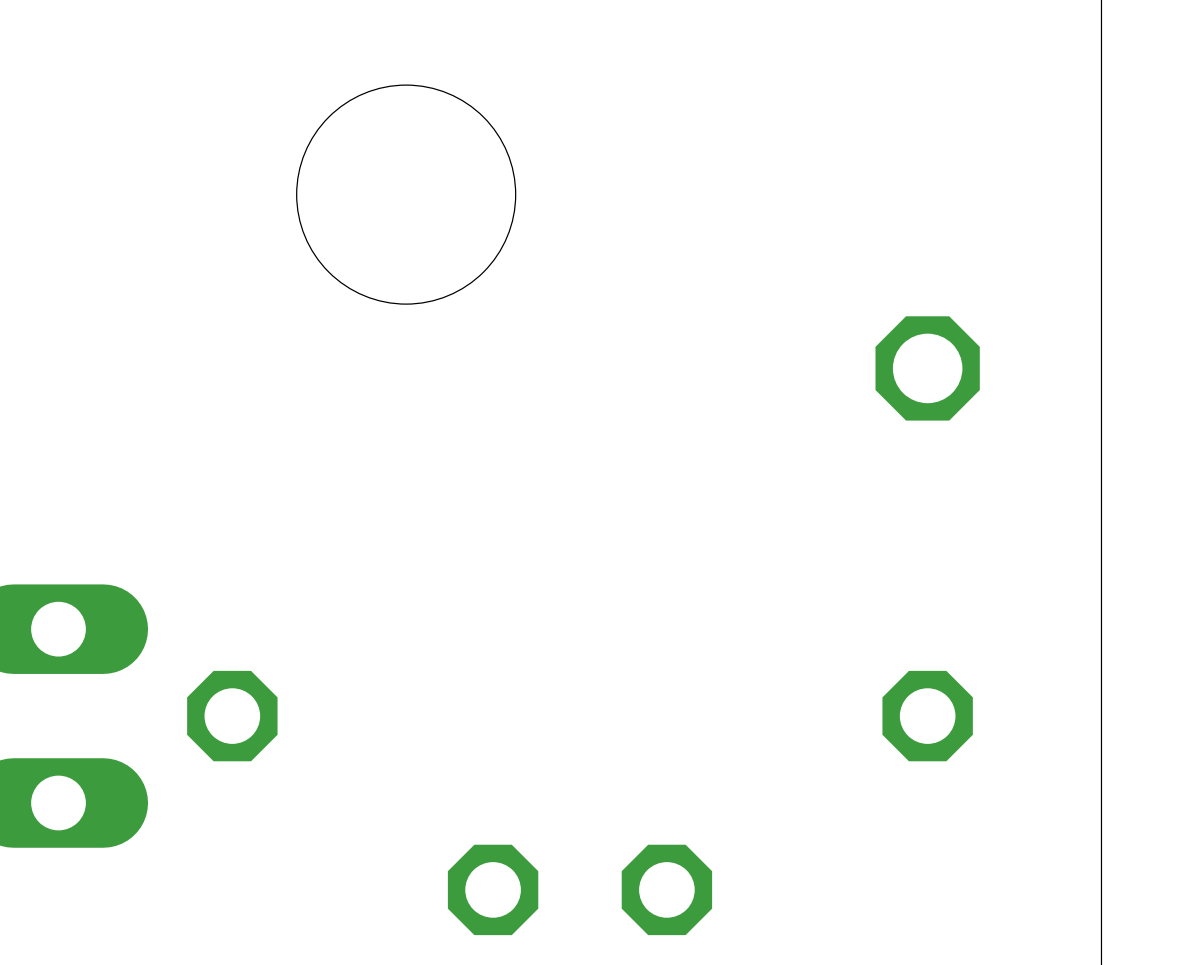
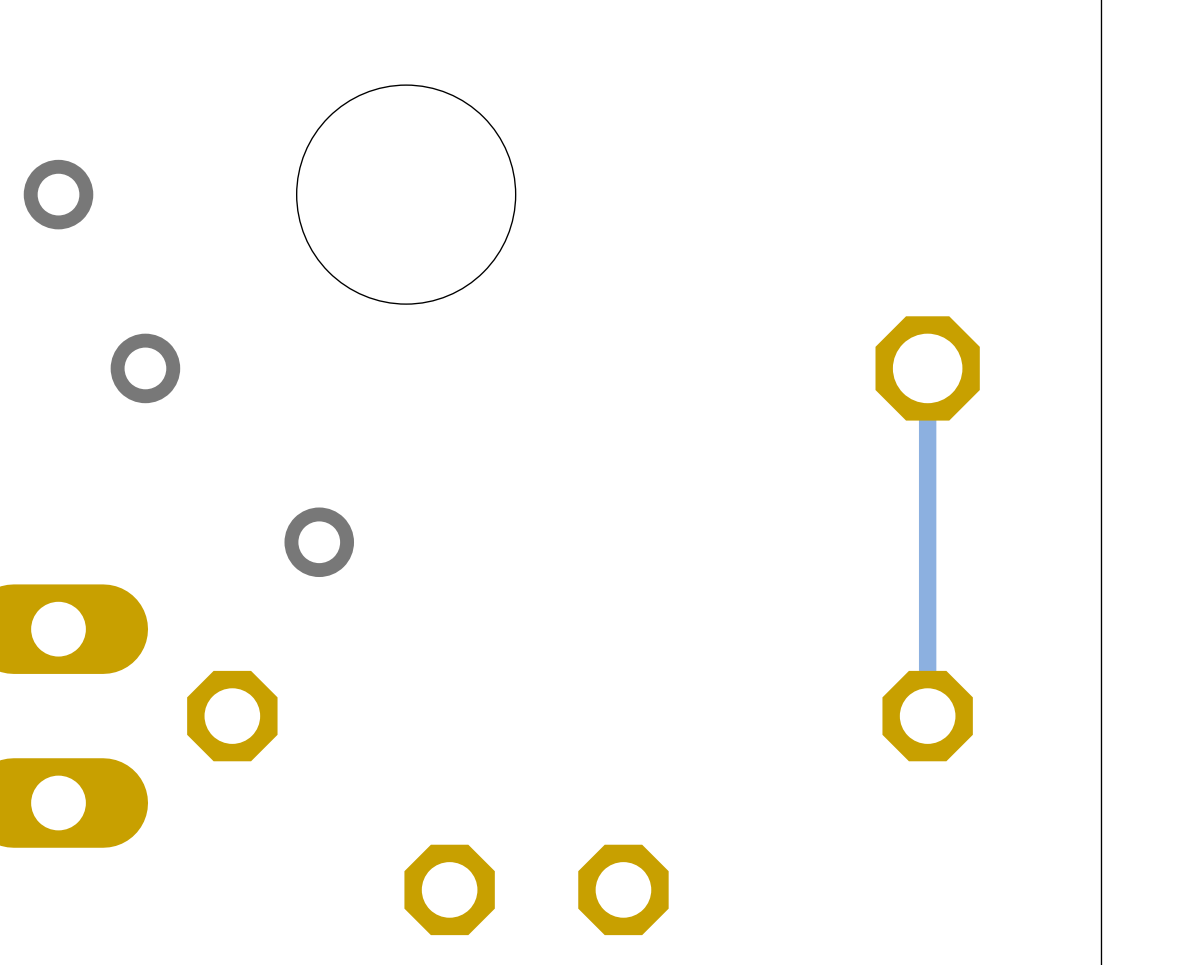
via: none -> (58, 194)
via: none -> (145, 368)
track: none -> (927, 368) (927, 716)
via: none -> (319, 542)
part position: (579, 889) -> (536, 889)

